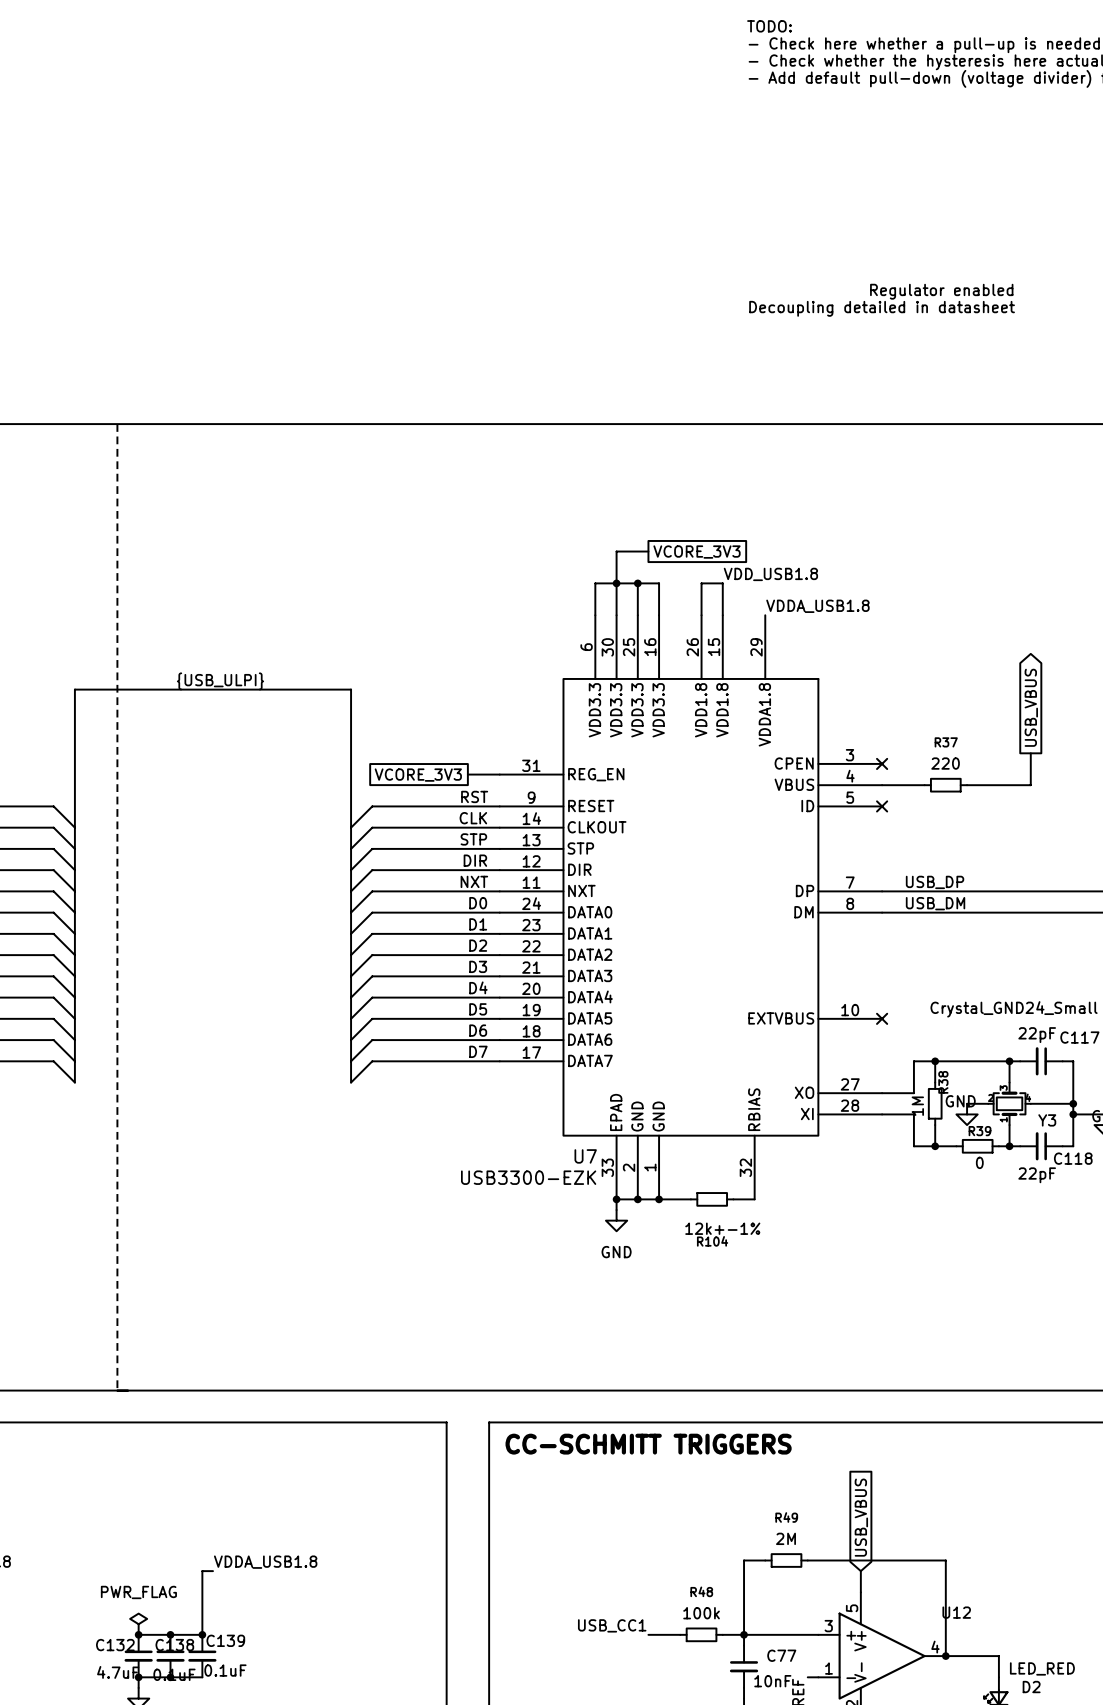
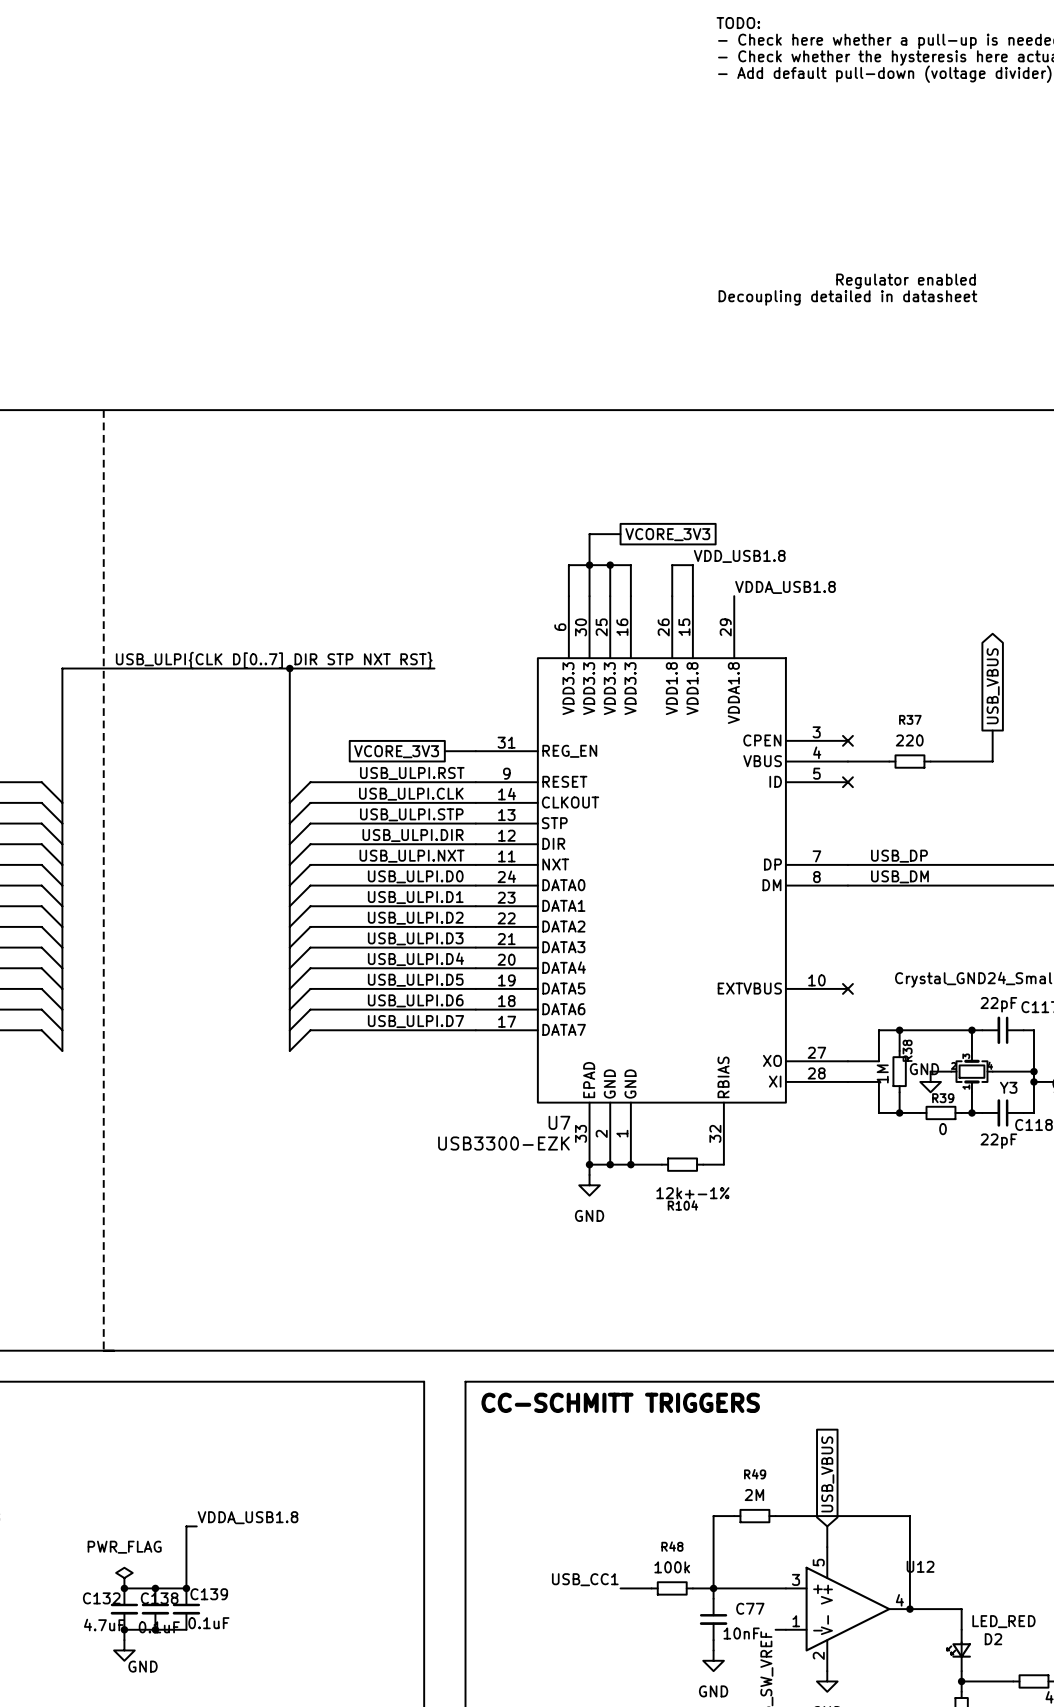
label: {USB_ULPI} (220, 681) -> none
label: none -> USB_ULPI{CLK D[0..7] DIR STP NXT RST} (274, 660)
bus: none -> (289, 668) (289, 1050)
junction: none -> (289, 668)
bus: (351, 689) (351, 1082) -> (331, 668) (434, 668)
label: RST (474, 796) -> USB_ULPI.RST (412, 773)
wire: (372, 806) (351, 827) -> (351, 782) (310, 782) (289, 802)
label: CLK (473, 818) -> USB_ULPI.CLK (411, 794)
wire: (372, 827) (351, 848) -> (351, 802) (310, 802) (289, 823)
label: STP (473, 839) -> USB_ULPI.STP (411, 814)
wire: (372, 848) (351, 870) -> (351, 823) (310, 823) (289, 844)
label: DIR (475, 860) -> USB_ULPI.DIR (413, 835)
wire: (372, 870) (351, 891) -> (351, 844) (310, 844) (289, 864)
label: NXT (474, 881) -> USB_ULPI.NXT (412, 856)
wire: (372, 891) (351, 912) -> (351, 864) (310, 864) (289, 885)
label: D0 (478, 903) -> USB_ULPI.D0 (415, 876)
wire: (372, 912) (351, 933) -> (351, 885) (310, 885) (289, 906)
label: D1 (478, 924) -> USB_ULPI.D1 (415, 897)
wire: (372, 933) (351, 955) -> (351, 906) (310, 906) (289, 926)
label: D2 (478, 945) -> USB_ULPI.D2 (415, 918)
wire: (372, 955) (351, 976) -> (351, 926) (310, 926) (289, 947)
label: D3 (478, 966) -> USB_ULPI.D3 (415, 938)
wire: (372, 976) (351, 997) -> (351, 947) (310, 947) (289, 968)
label: D4 (478, 987) -> USB_ULPI.D4 (415, 959)
wire: (372, 997) (351, 1018) -> (351, 968) (310, 968) (289, 988)
label: D5 (478, 1009) -> USB_ULPI.D5 (415, 980)
wire: (372, 1018) (351, 1040) -> (351, 988) (310, 988) (289, 1009)
label: D6 (478, 1030) -> USB_ULPI.D6 (415, 1000)
wire: (372, 1040) (351, 1061) -> (351, 1009) (310, 1009) (289, 1030)
label: D7 (478, 1051) -> USB_ULPI.D7 (415, 1021)
wire: (372, 1061) (351, 1082) -> (351, 1030) (310, 1030) (289, 1050)

